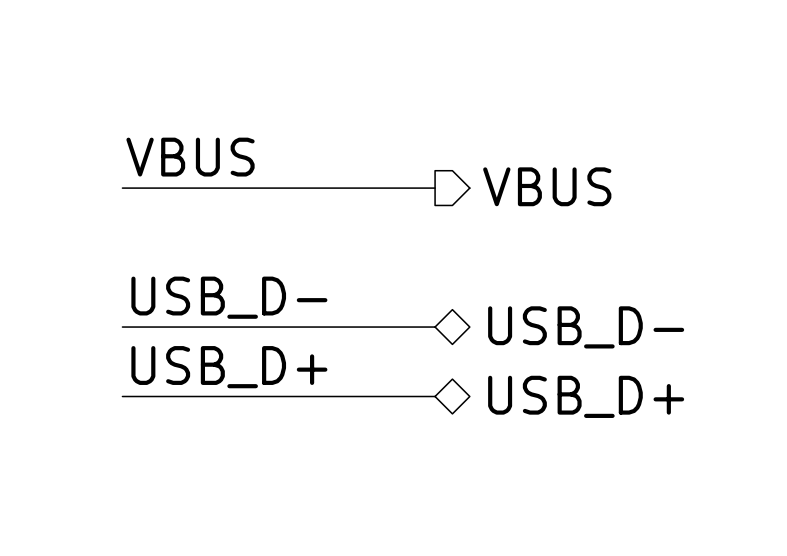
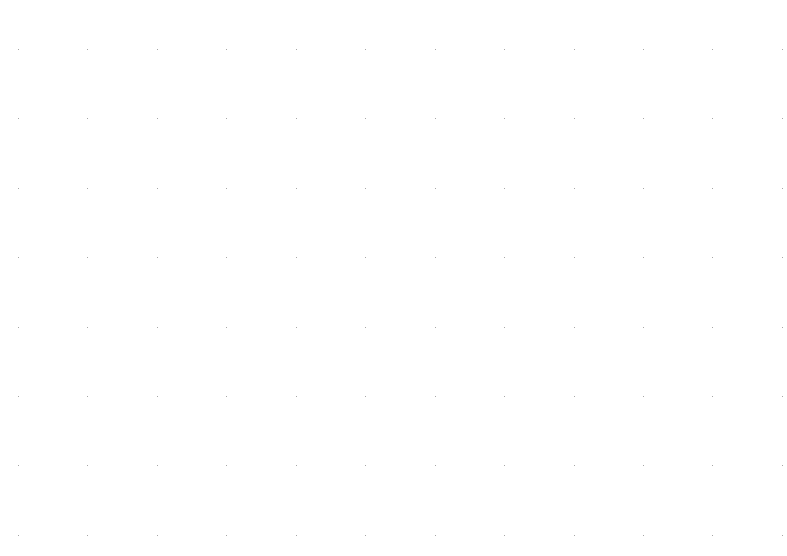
label: VBUS (190, 157) -> none
hierarchical label: VBUS (547, 186) -> none
wire: (122, 188) (435, 188) -> none
label: USB_D- (229, 297) -> none
wire: (122, 327) (435, 327) -> none
hierarchical label: USB_D- (586, 327) -> none
label: USB_D+ (229, 367) -> none
wire: (122, 396) (435, 396) -> none
hierarchical label: USB_D+ (586, 396) -> none

